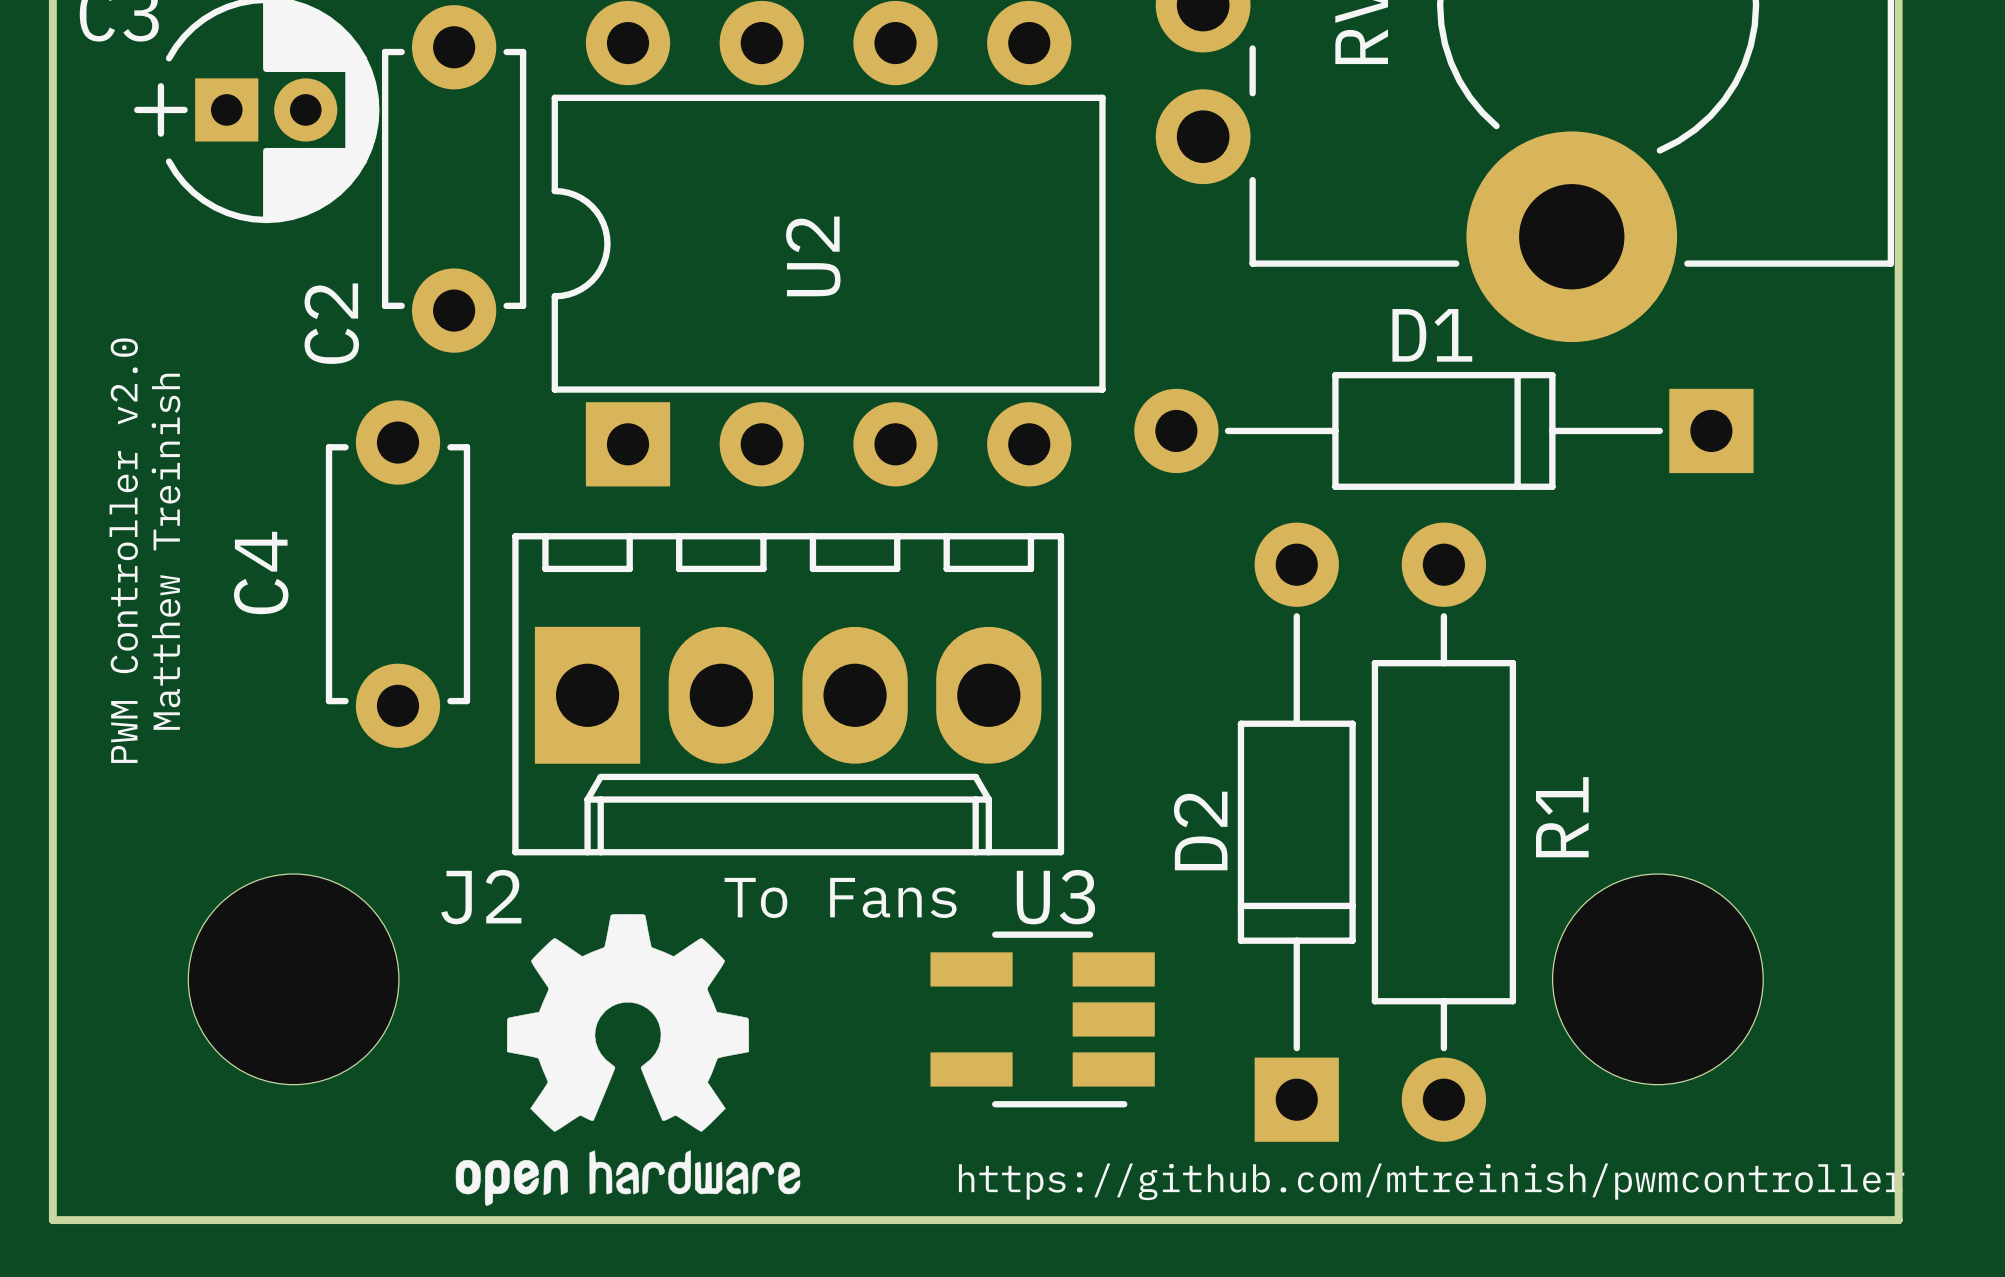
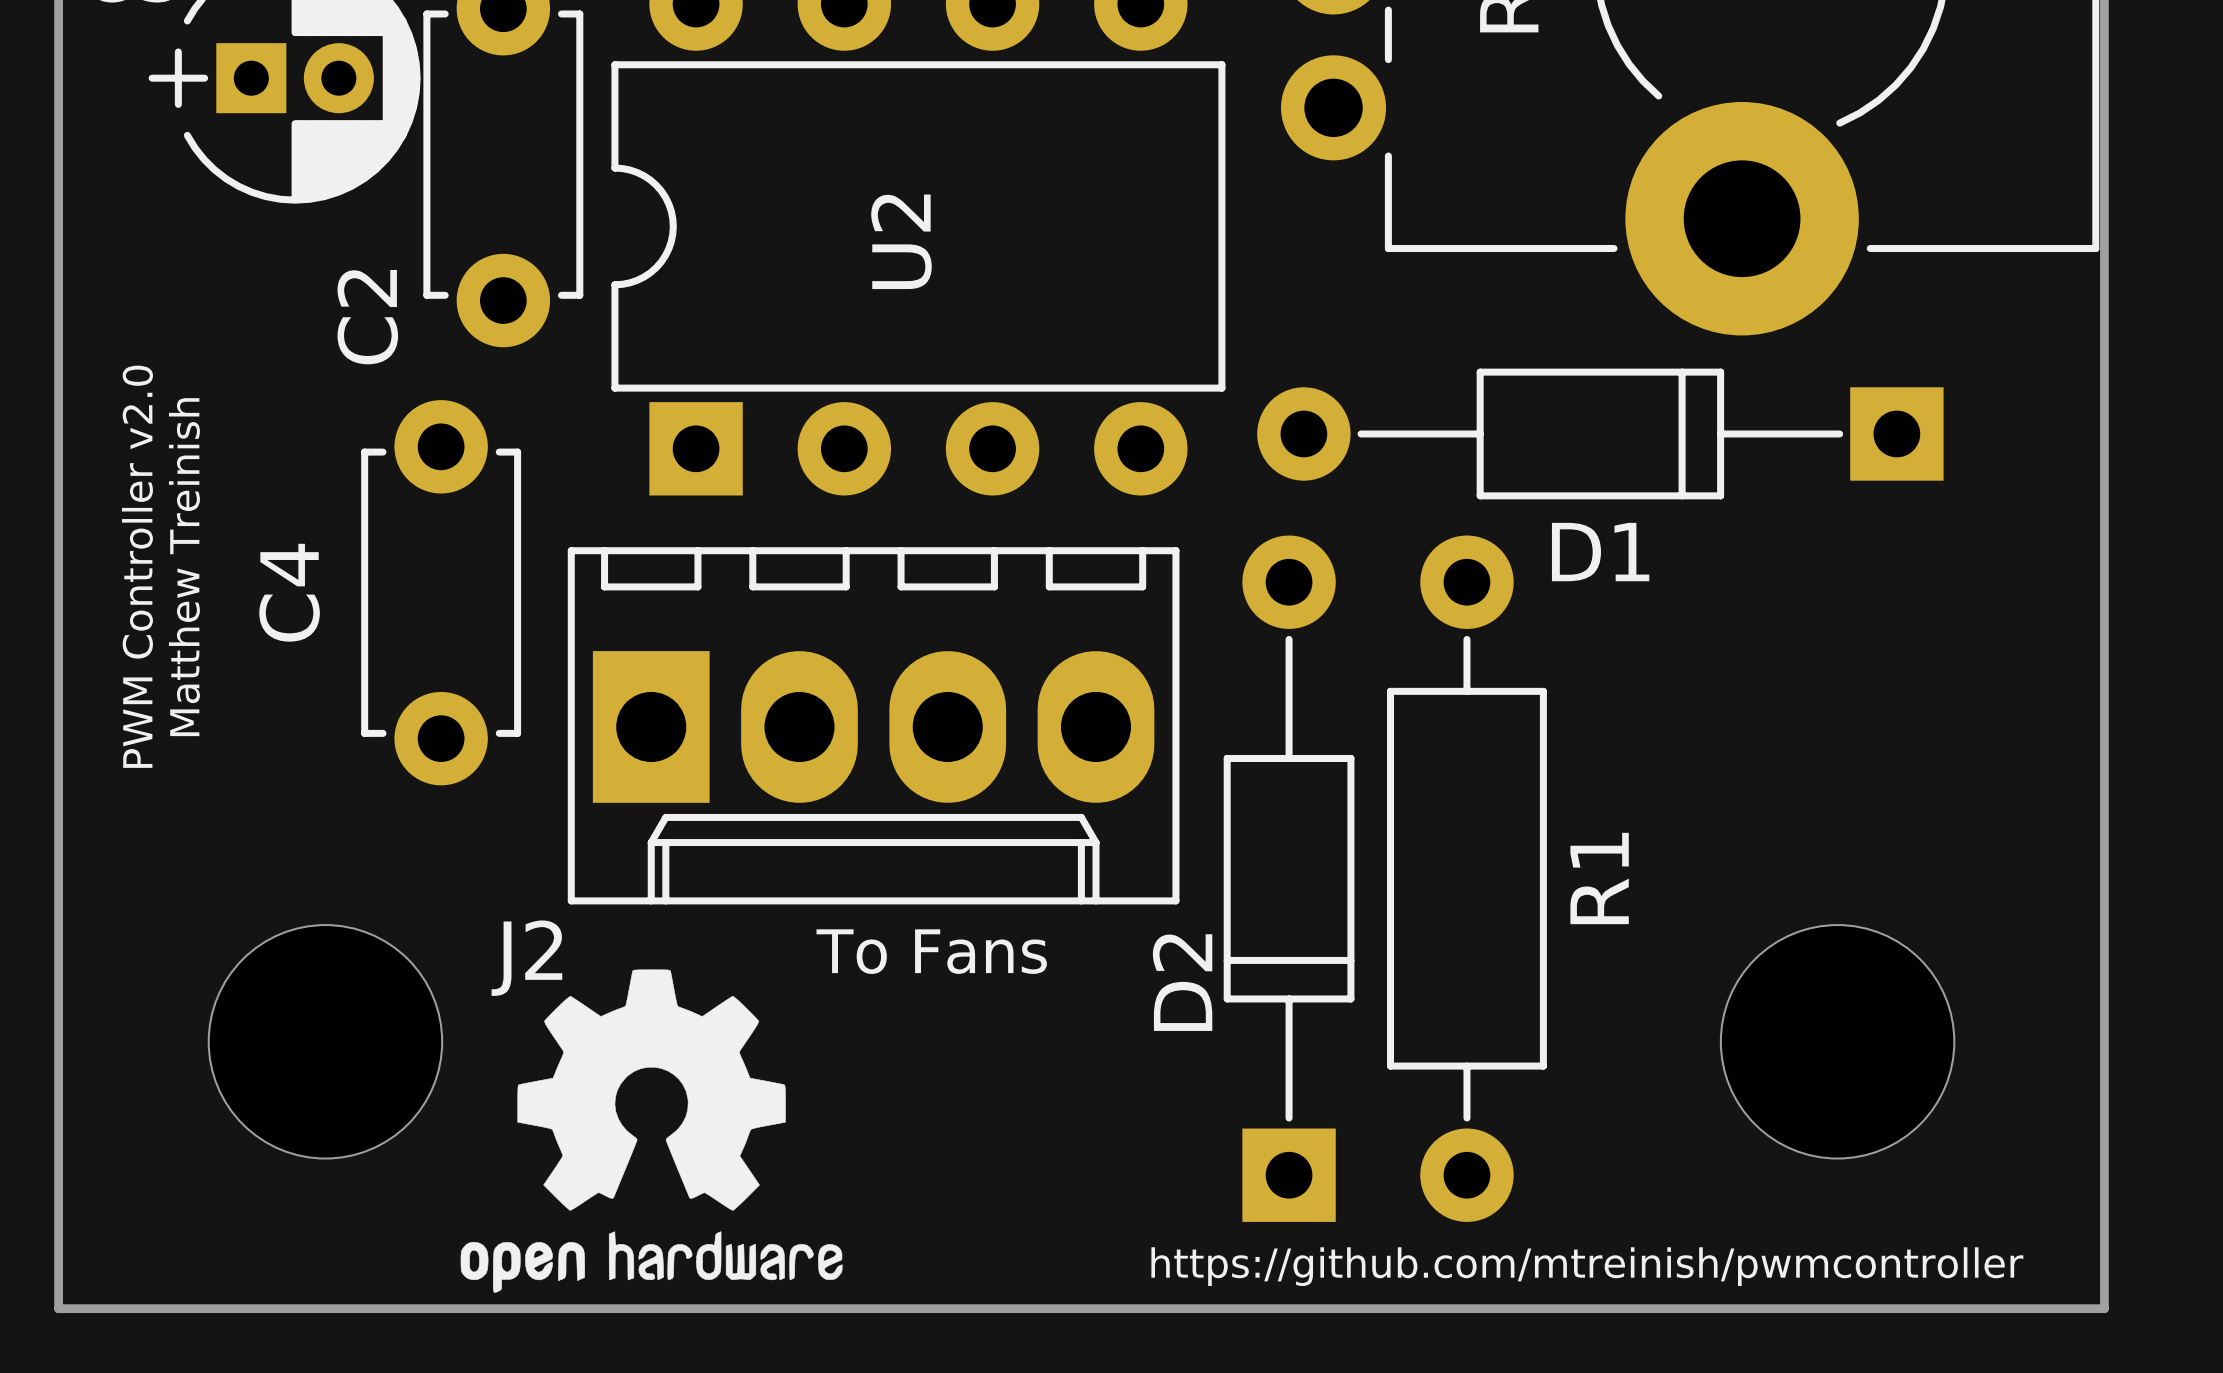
D1 name position: D1 (1432, 335) -> D1 (1600, 552)
R1 name position: R1 (1562, 817) -> R1 (1599, 878)
D2 name position: D2 (1200, 831) -> D2 (1182, 982)
D2 position: (1296, 832) -> (1289, 878)
R1 position: (1443, 832) -> (1466, 878)
U3: (1042, 1019) -> none
drawing position: (628, 1059) -> (651, 1131)

